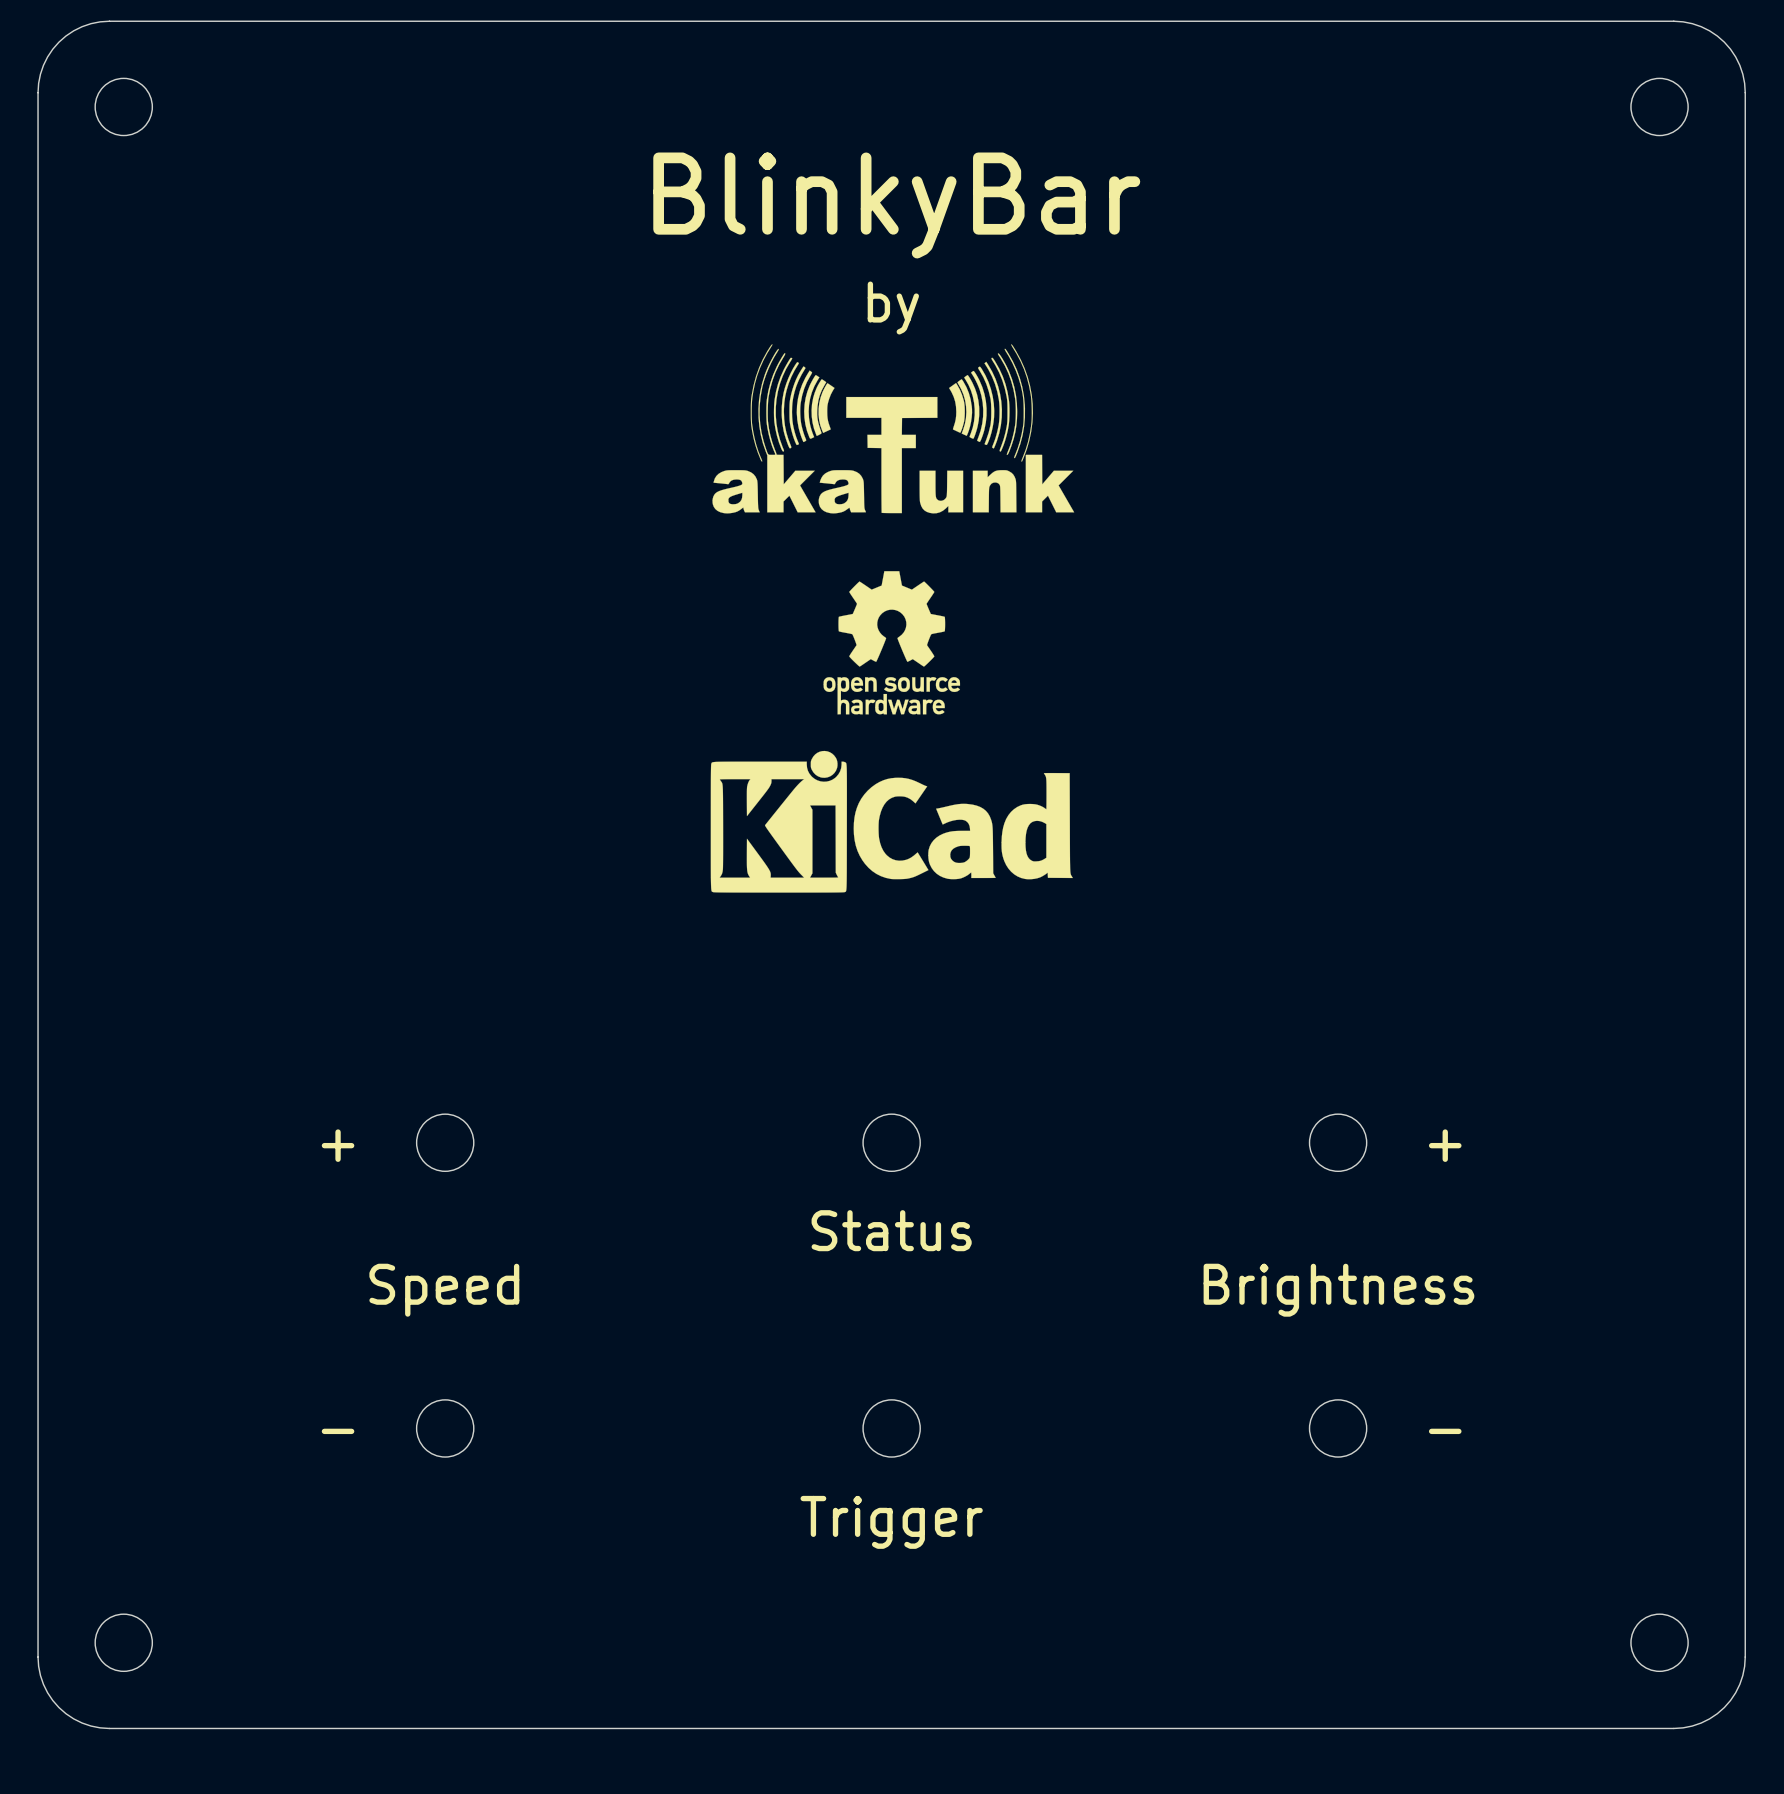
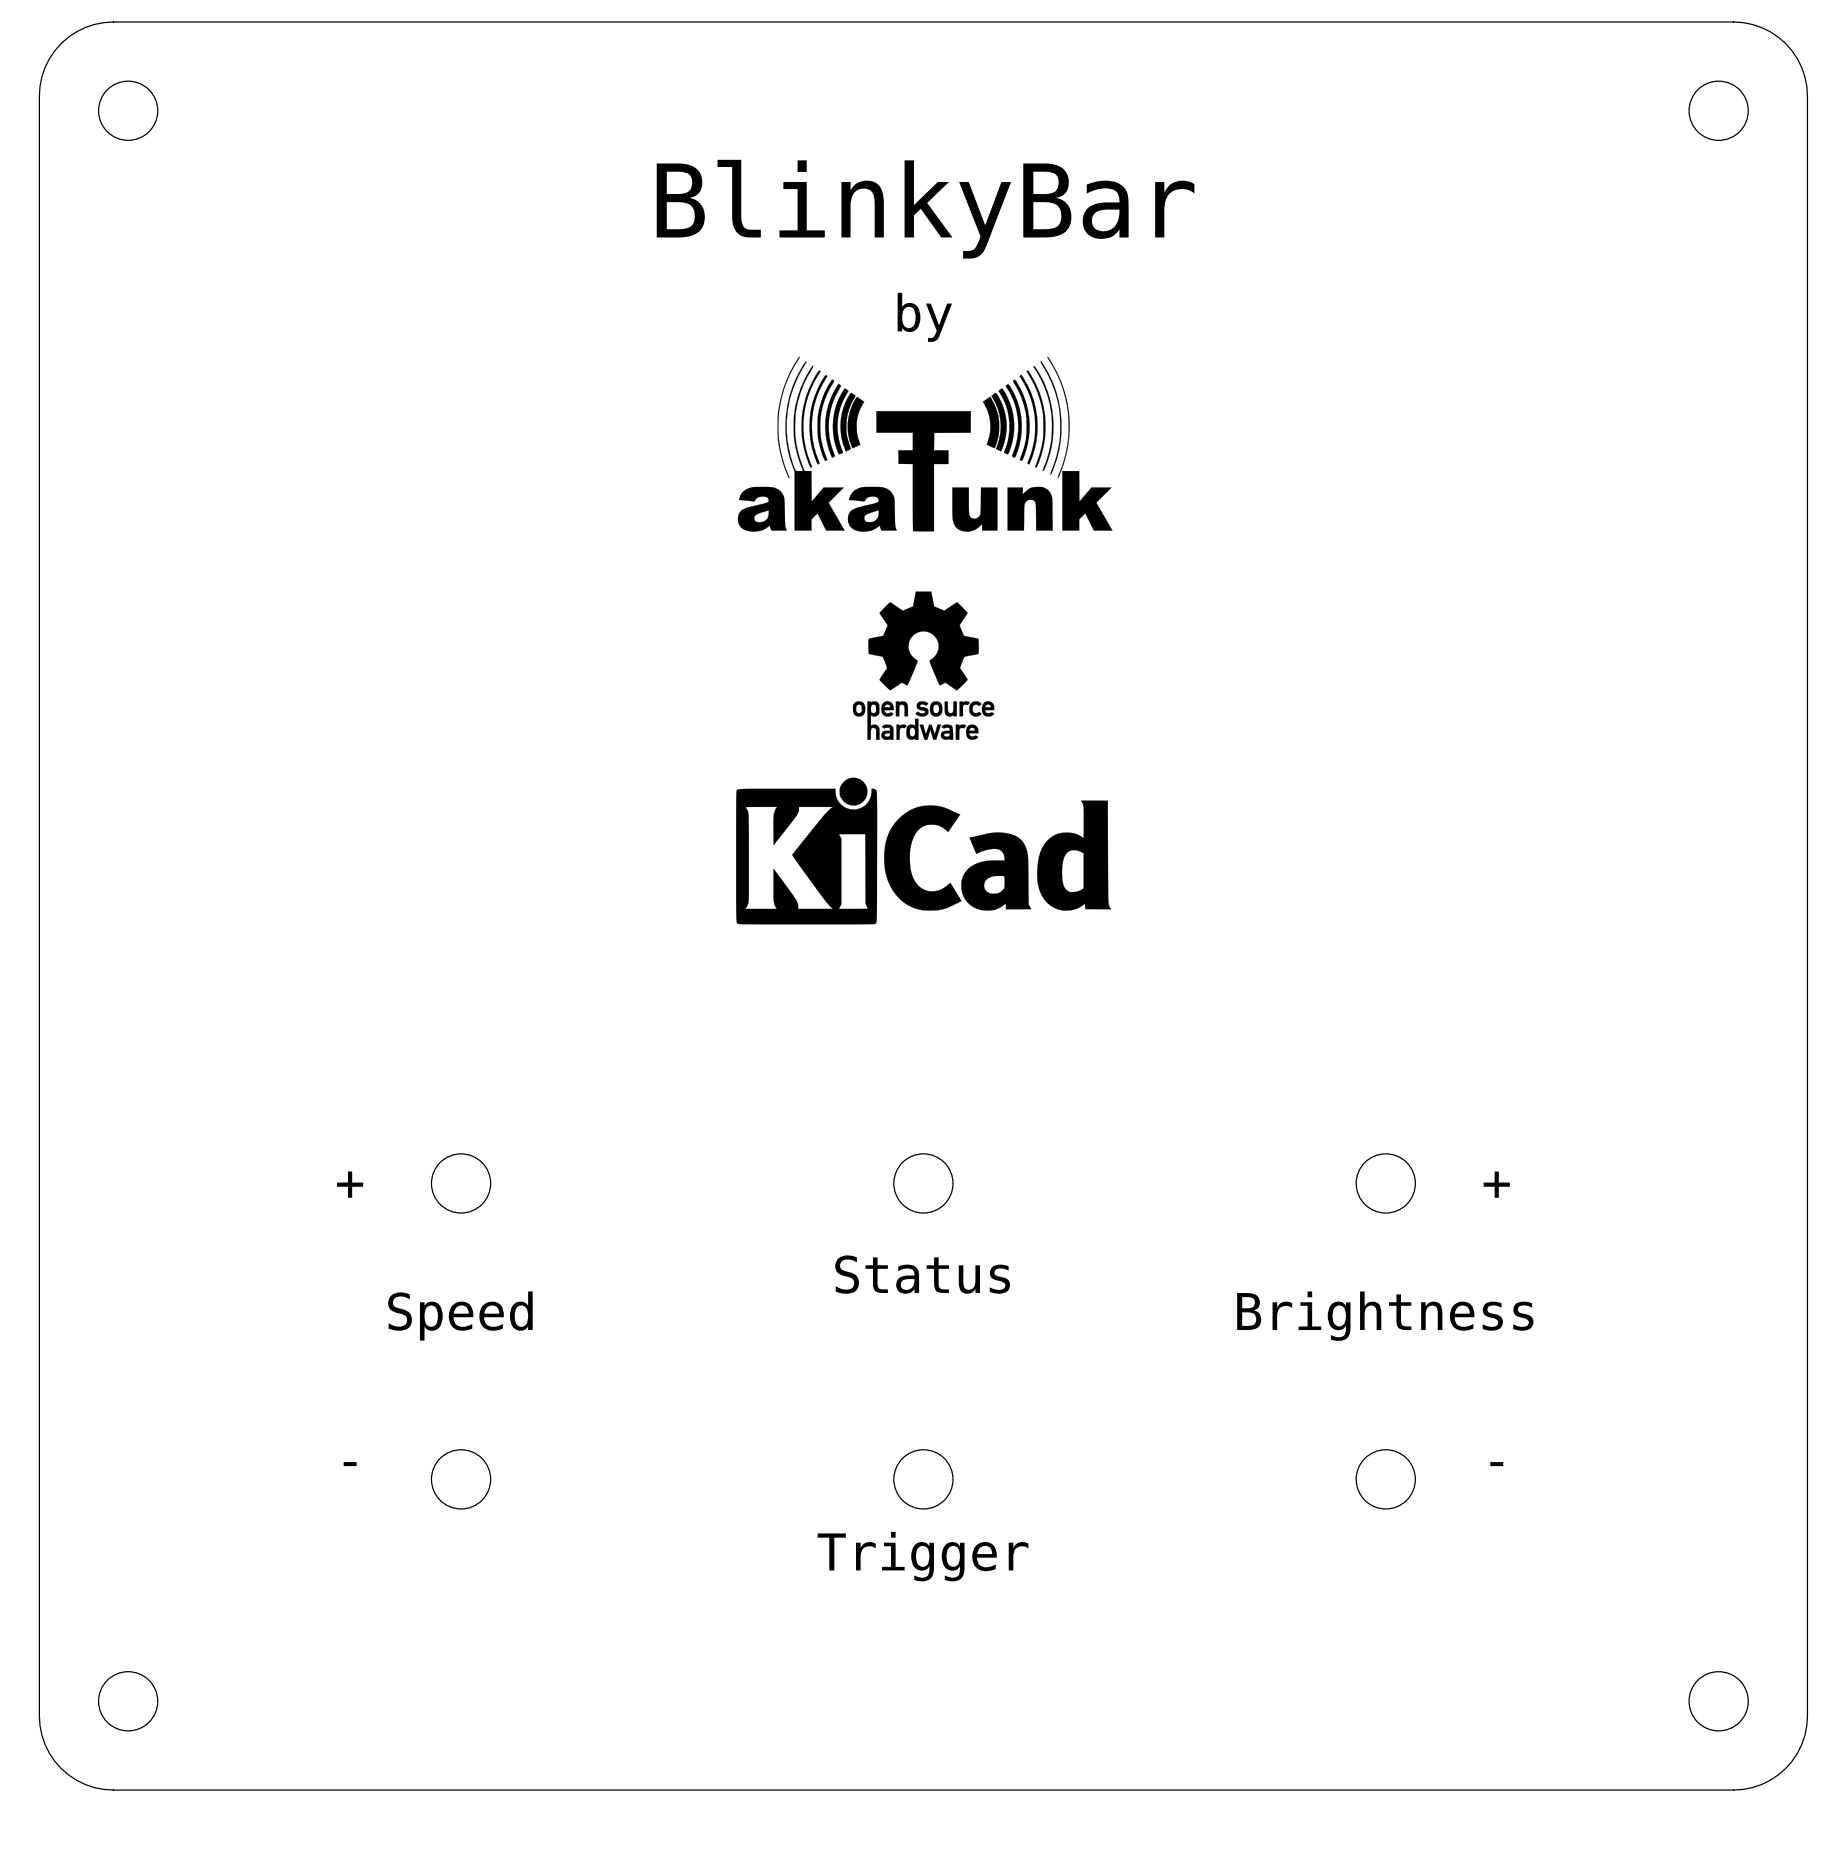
text position: Speed (444, 1290) -> Speed (460, 1316)
text position: Brightness (1338, 1290) -> Brightness (1385, 1316)
text position: - (338, 1431) -> - (350, 1464)
text position: - (1445, 1431) -> - (1496, 1464)
text position: Trigger (891, 1522) -> Trigger (923, 1556)

